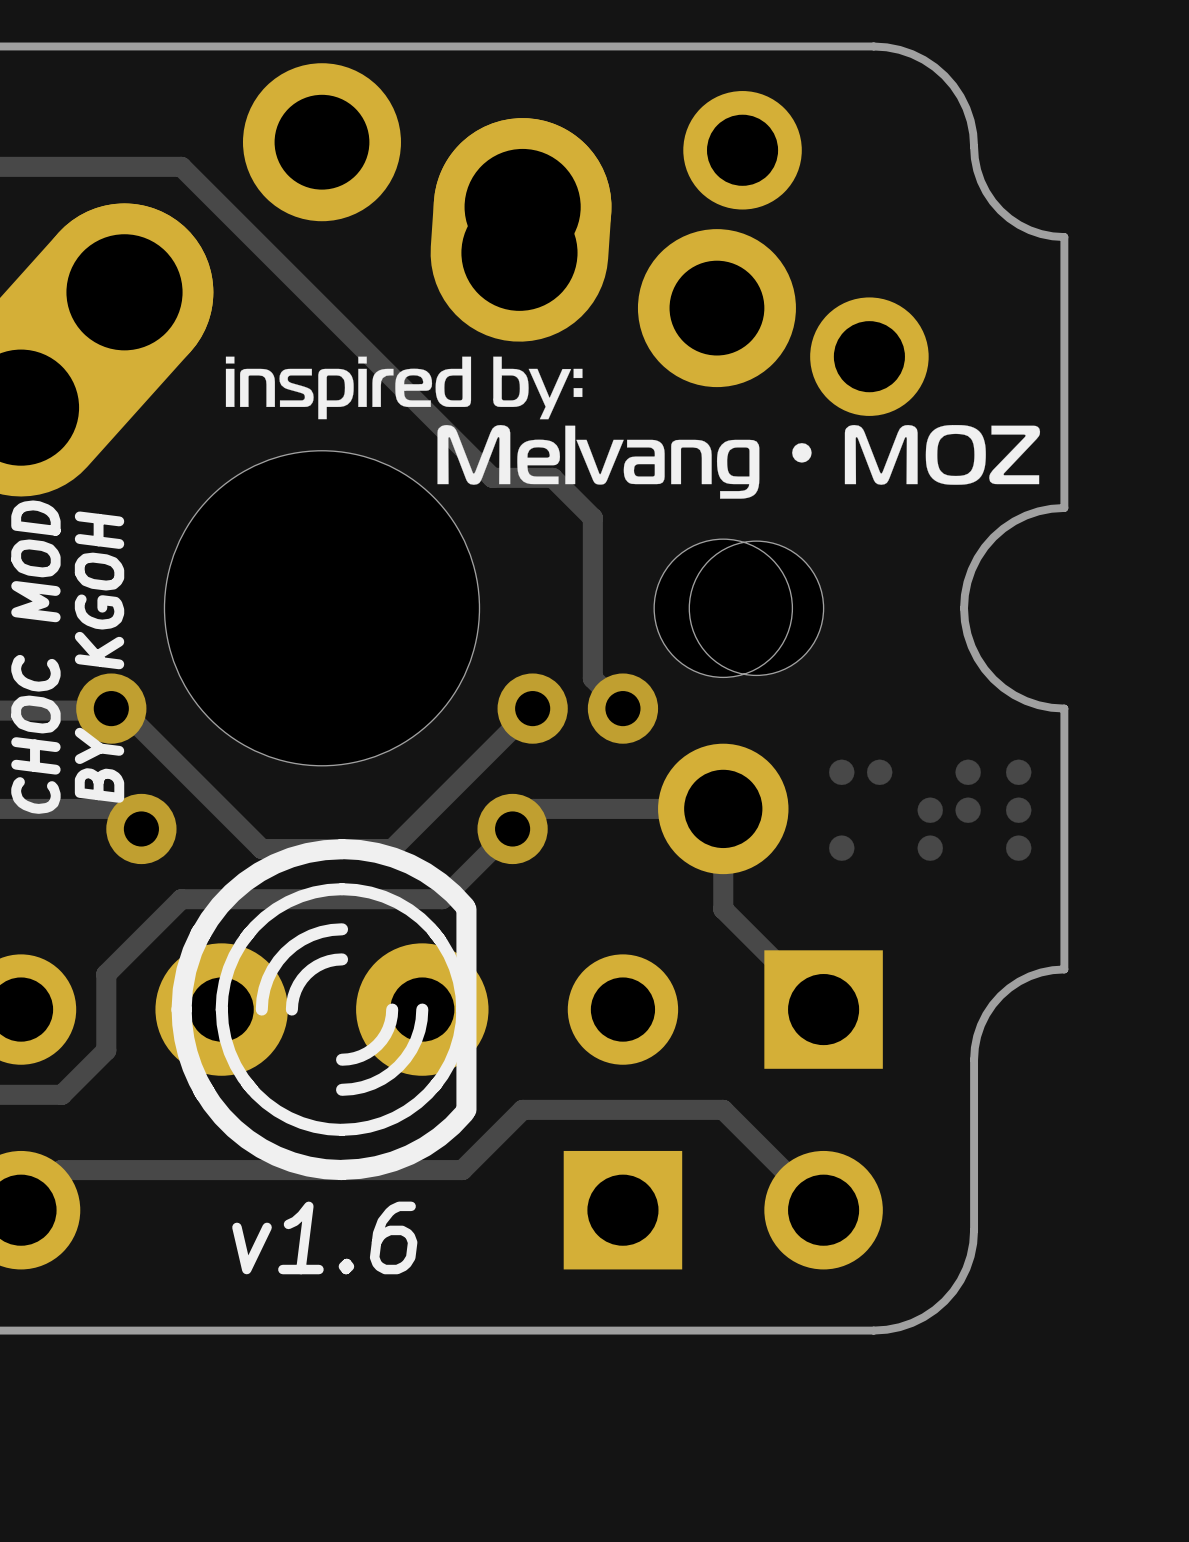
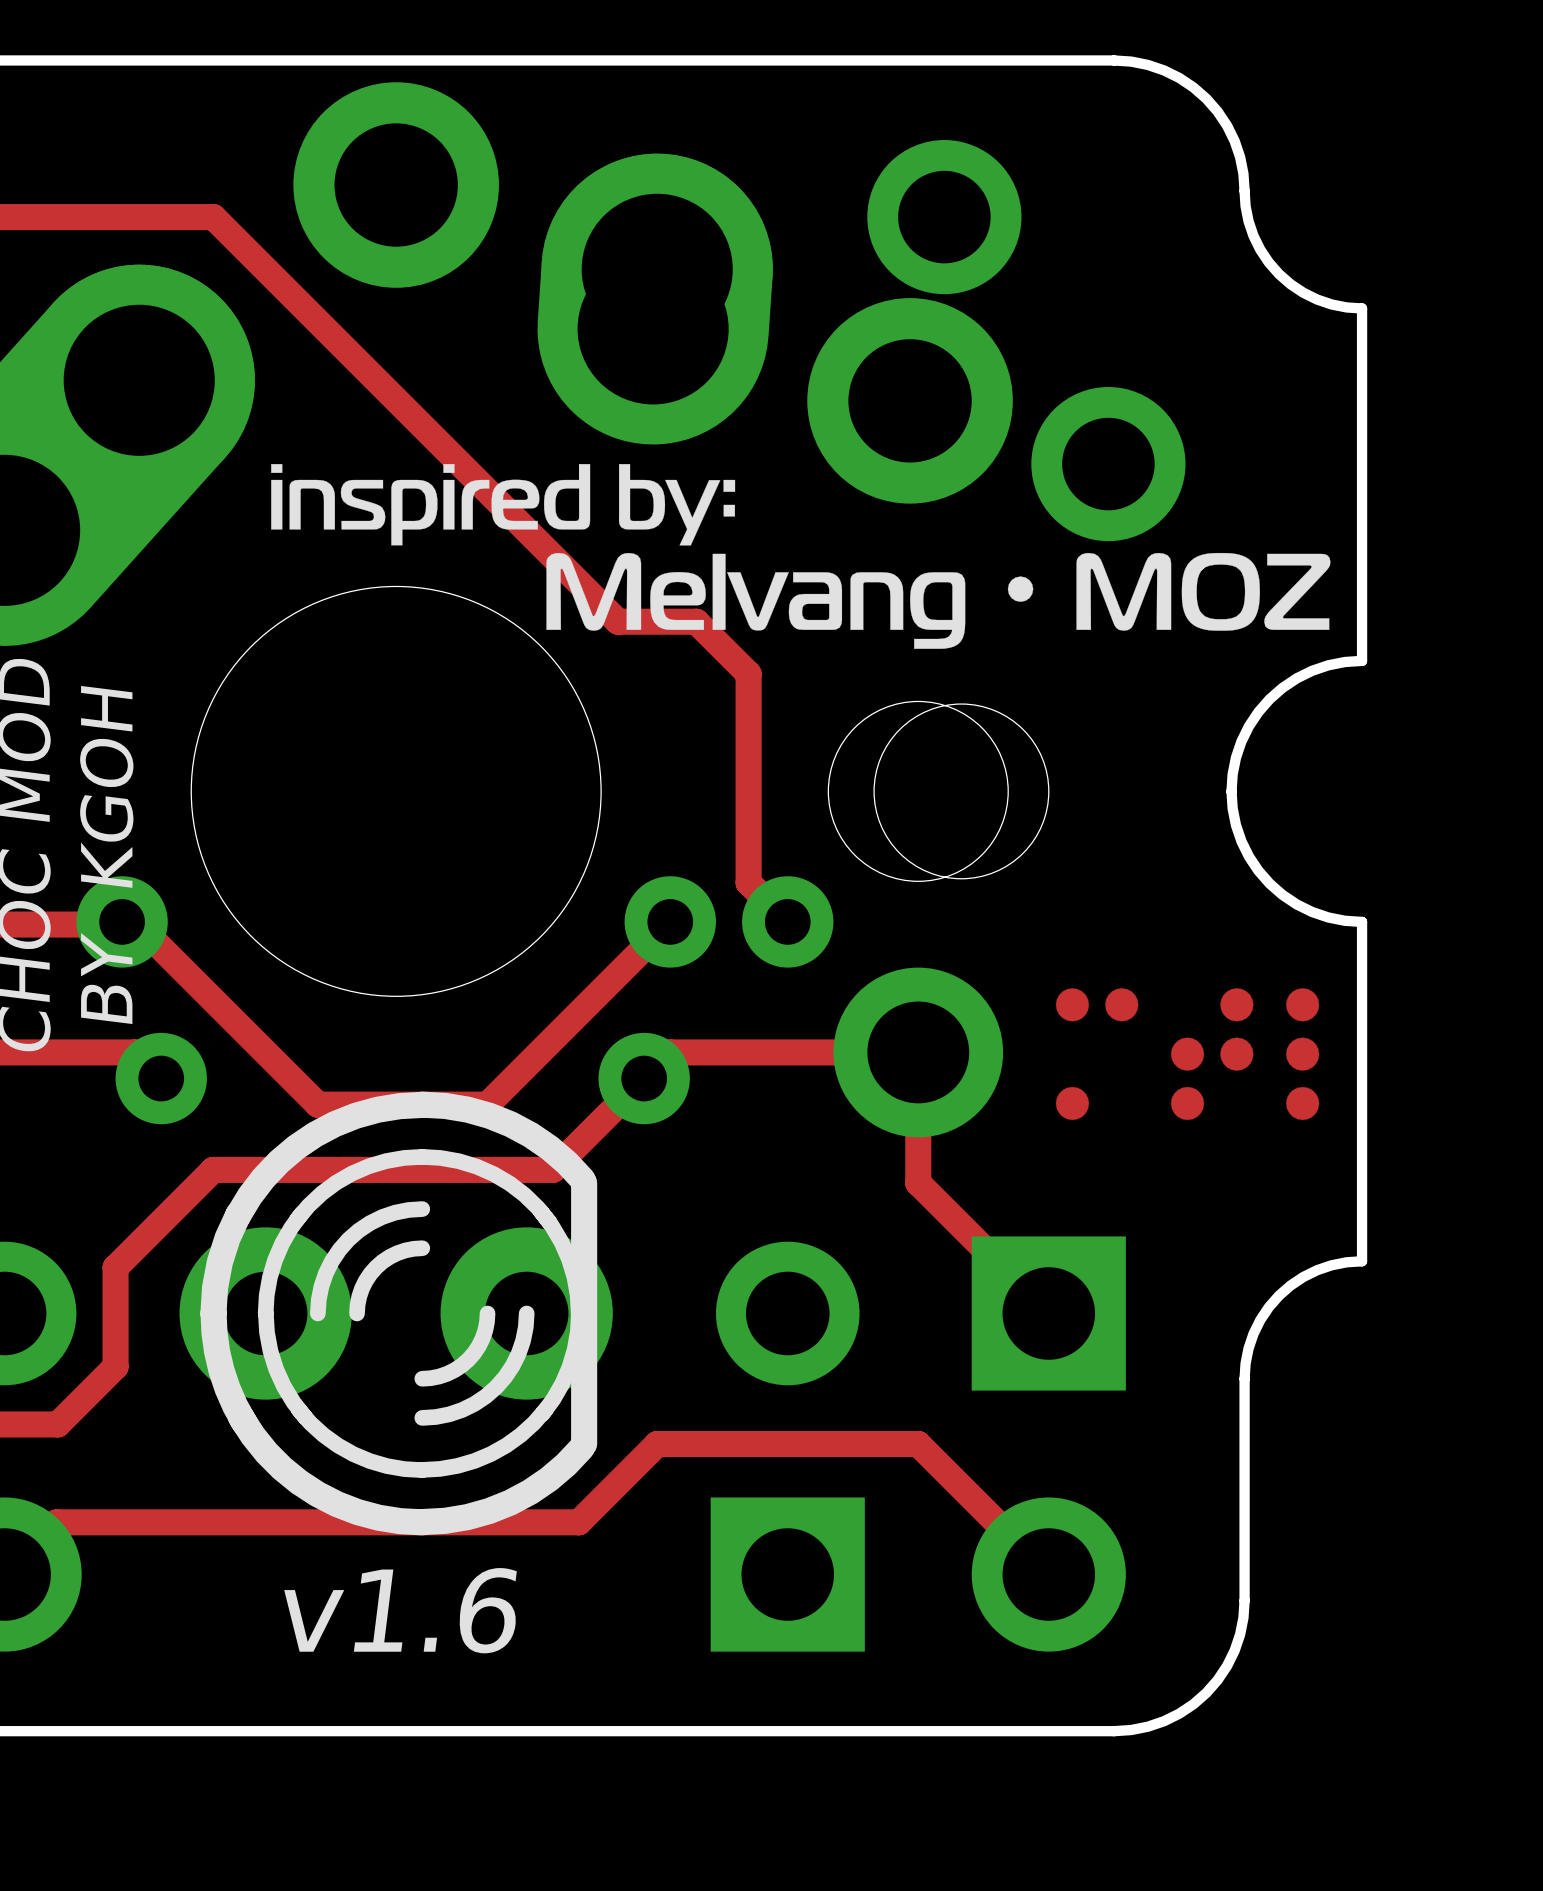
part position: (742, 150) -> (944, 217)

